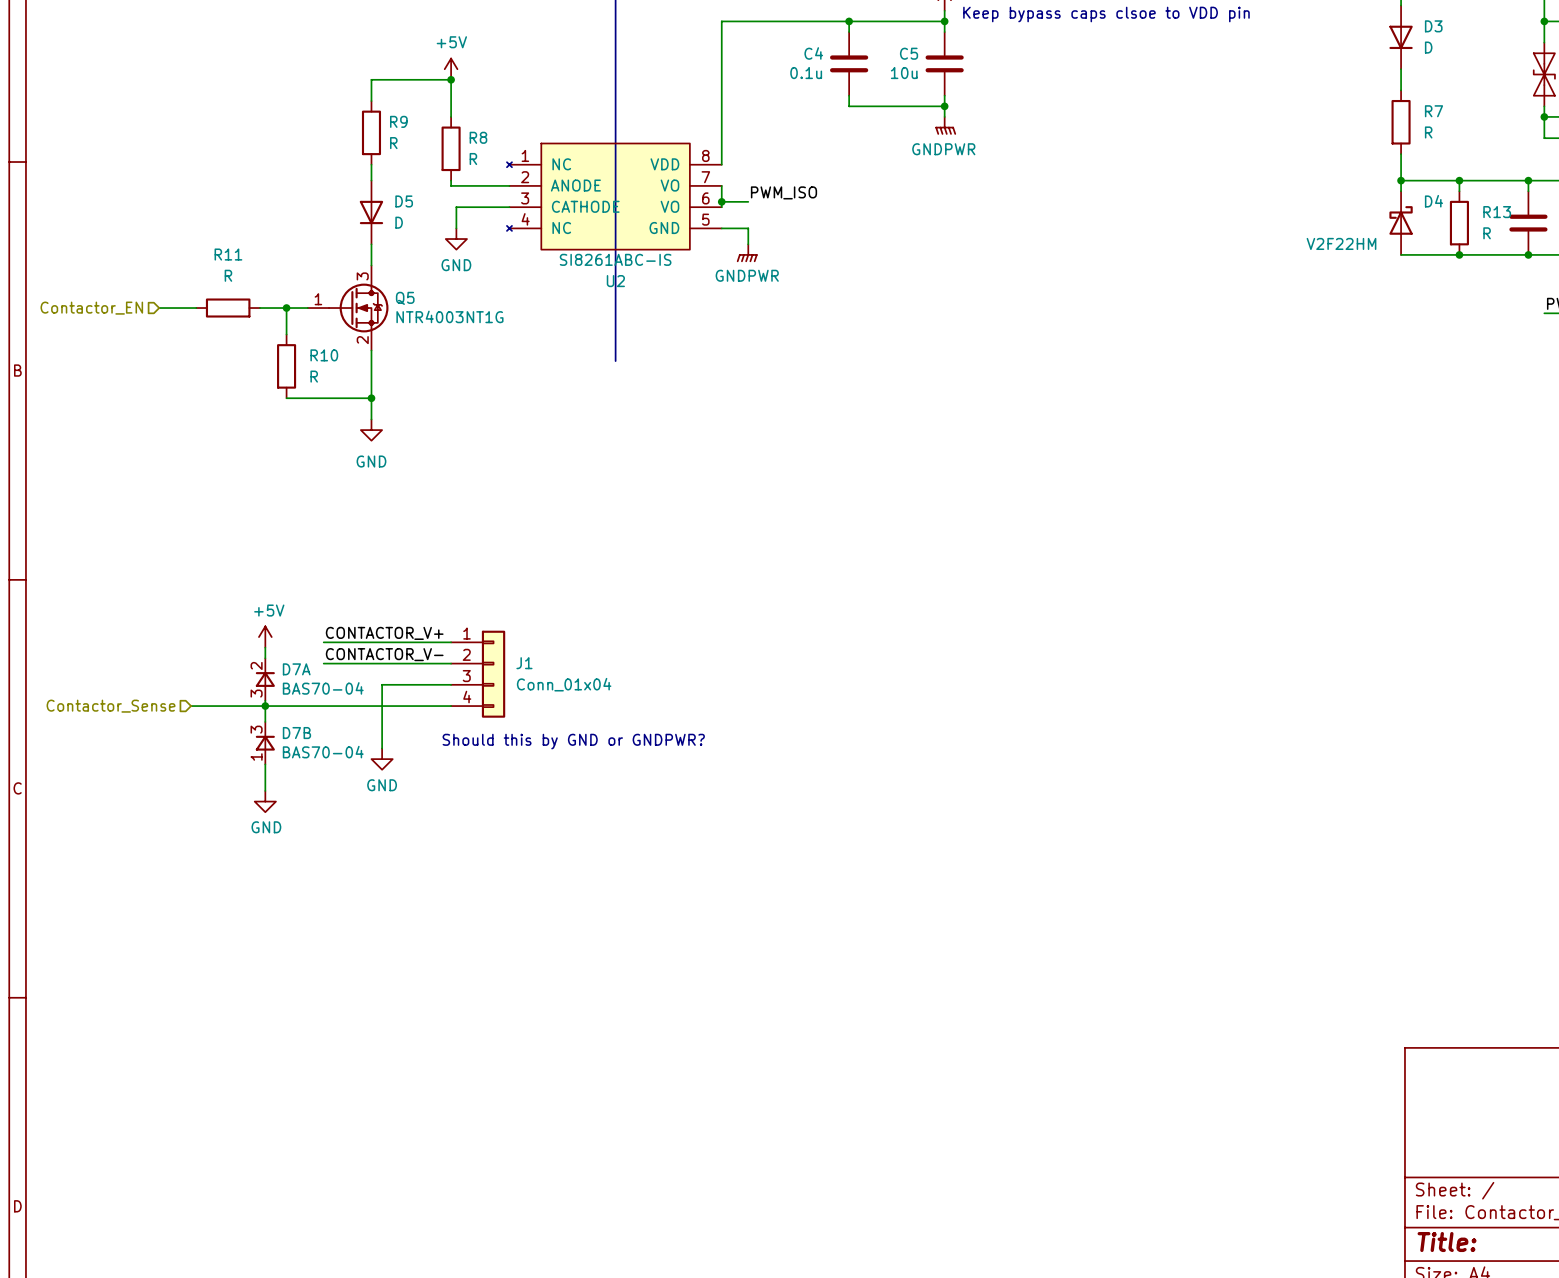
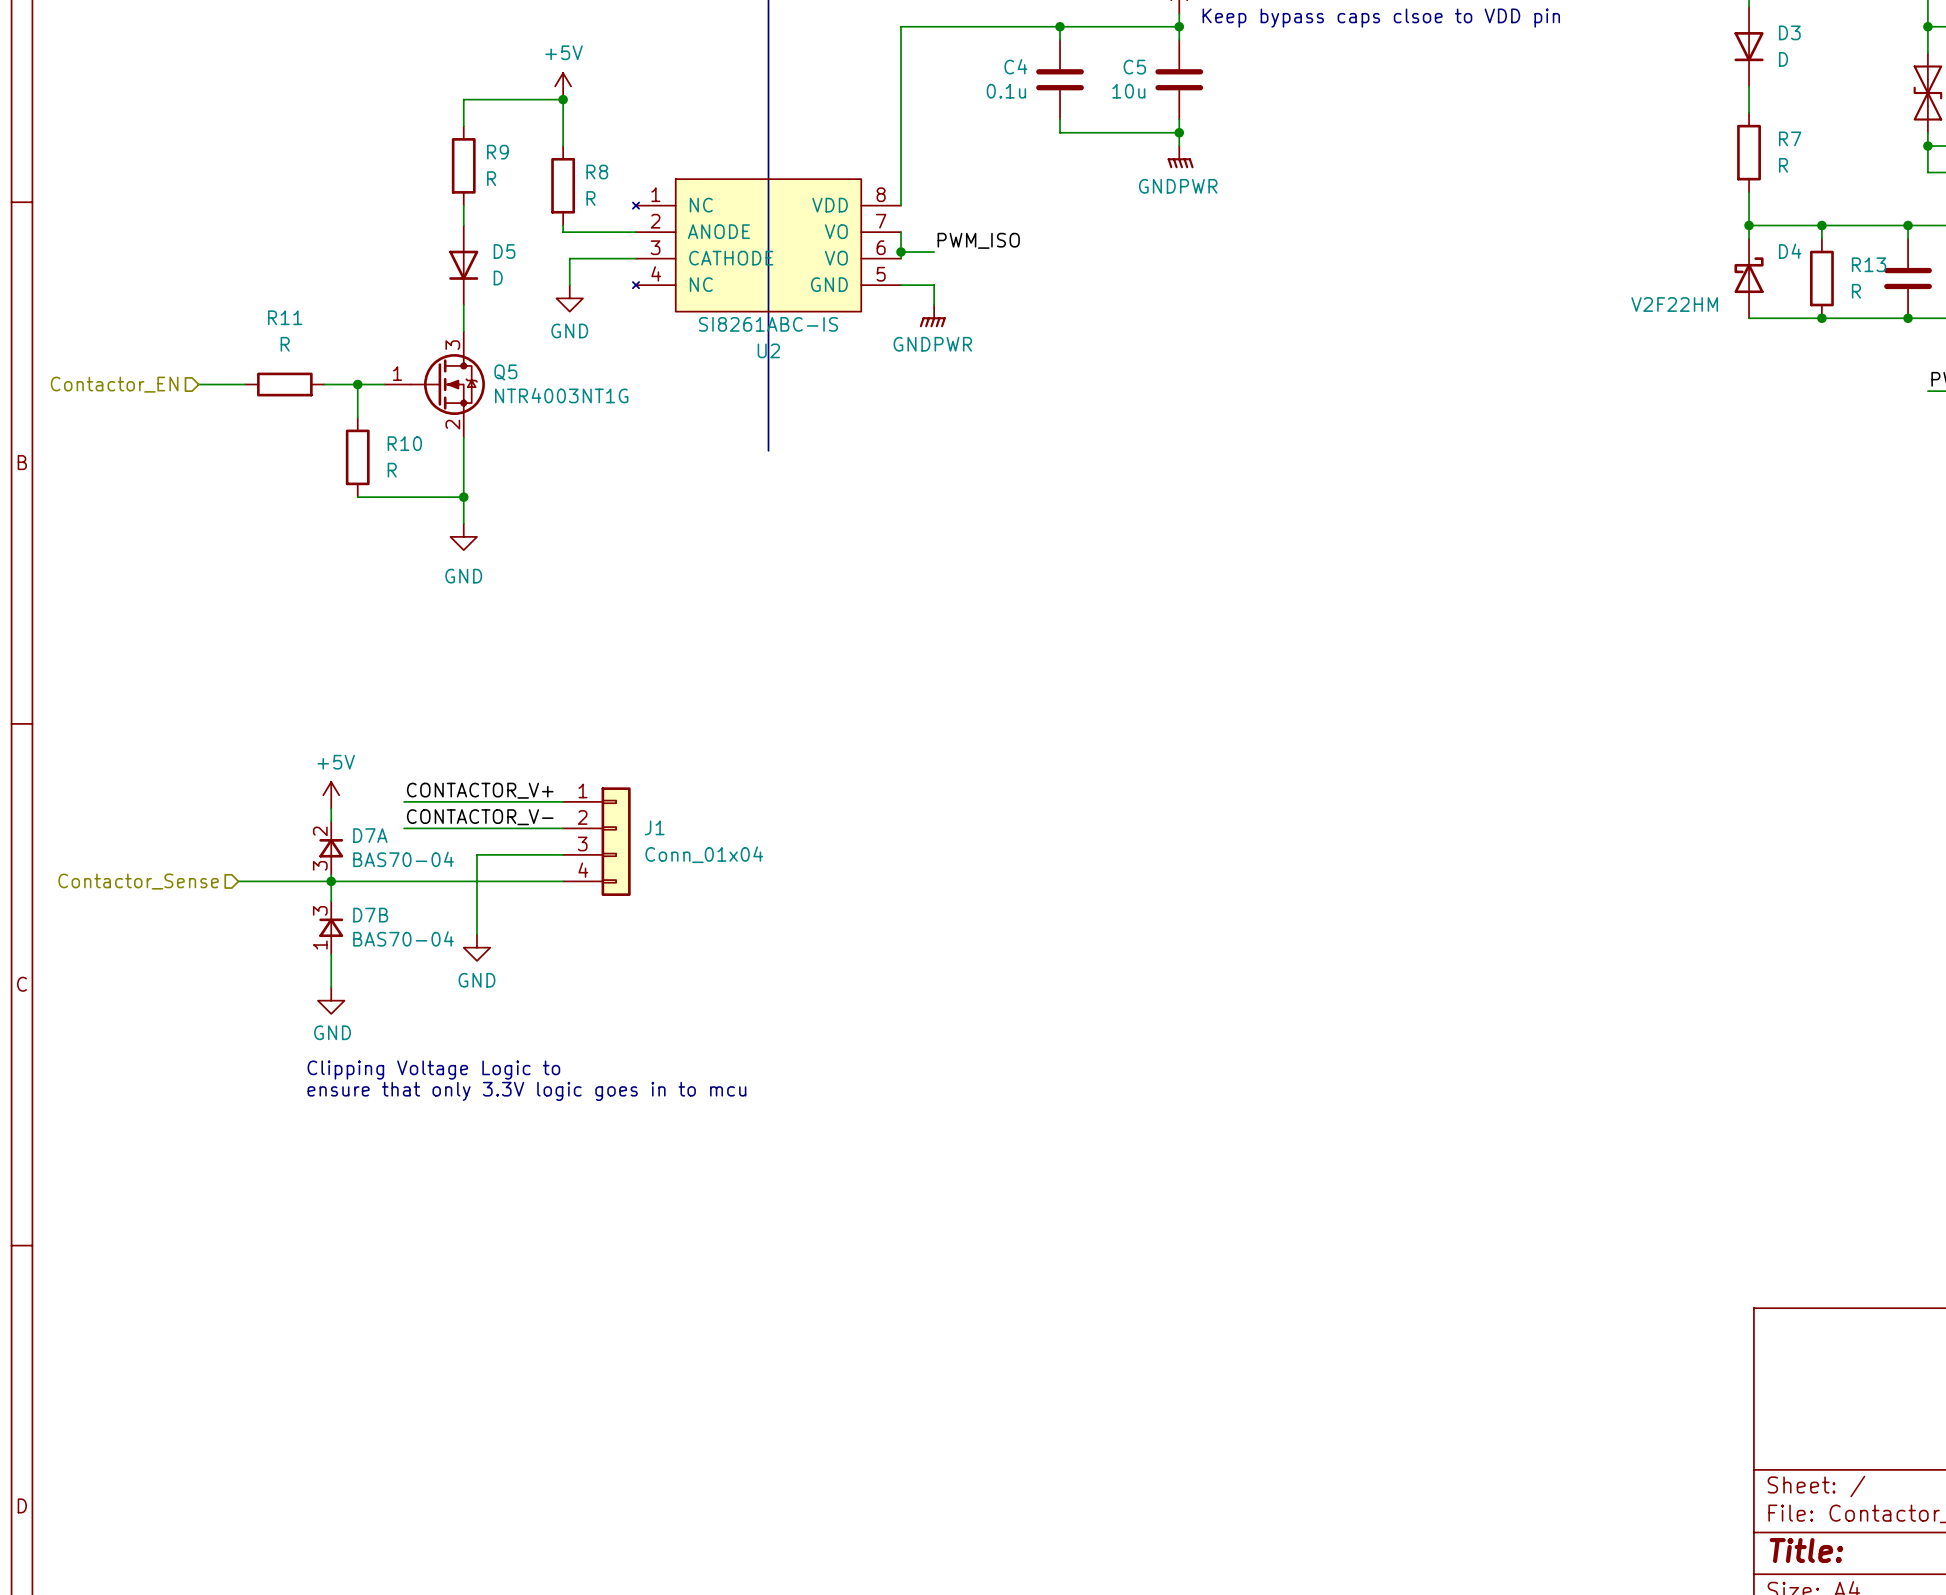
text: Should this by GND or GNDPWR? (573, 741) -> none
text: none -> Clipping Voltage Logic to (433, 1070)
text: none -> ensure that only 3.3V logic goes in to mcu (526, 1091)

